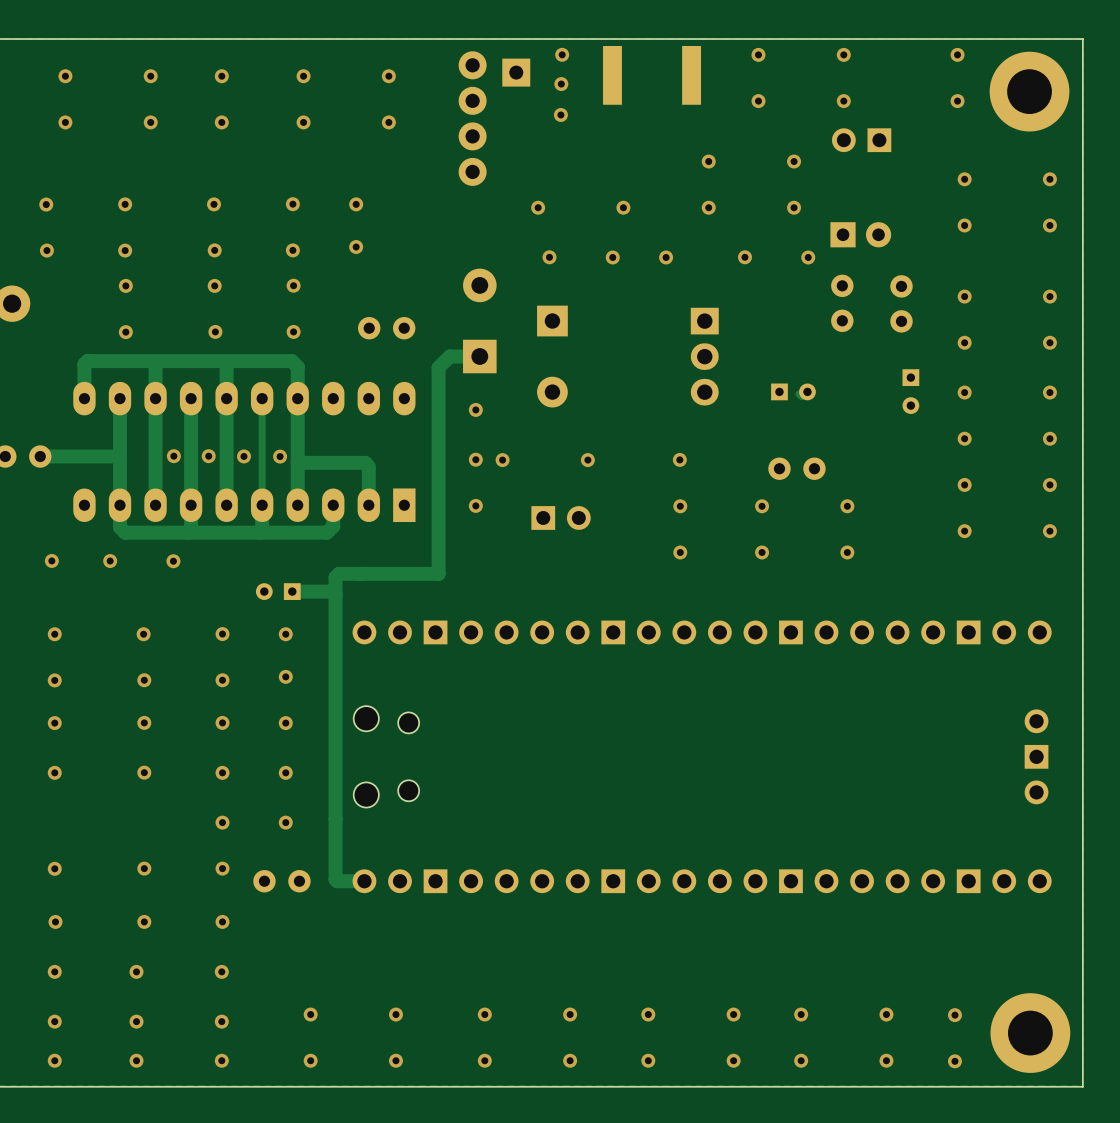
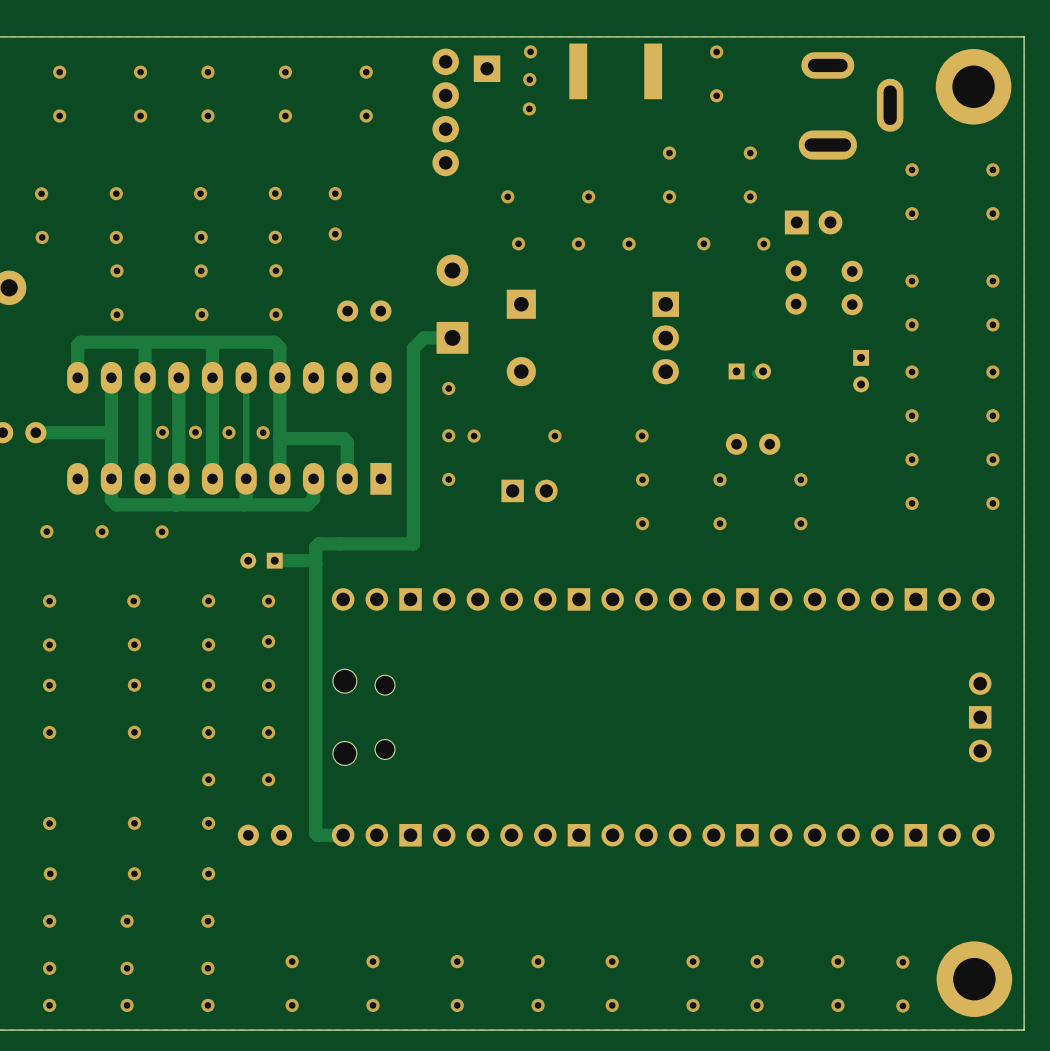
via: (843, 54) -> none
via: (957, 54) -> none
via: (843, 101) -> none
via: (957, 101) -> none
part: none -> (851, 105)
part: (861, 140) -> none

